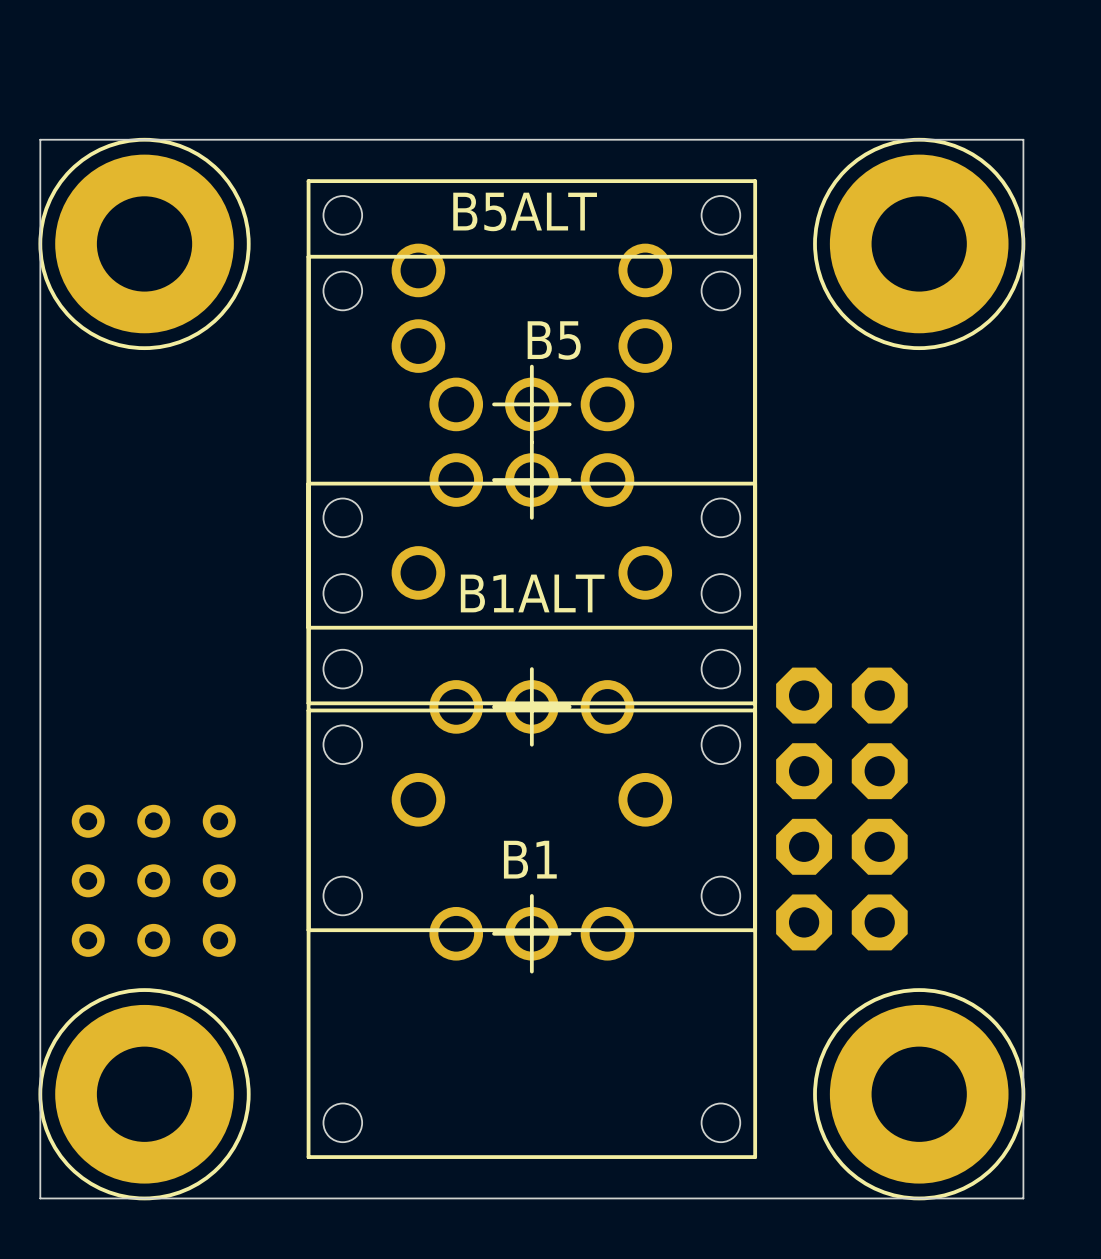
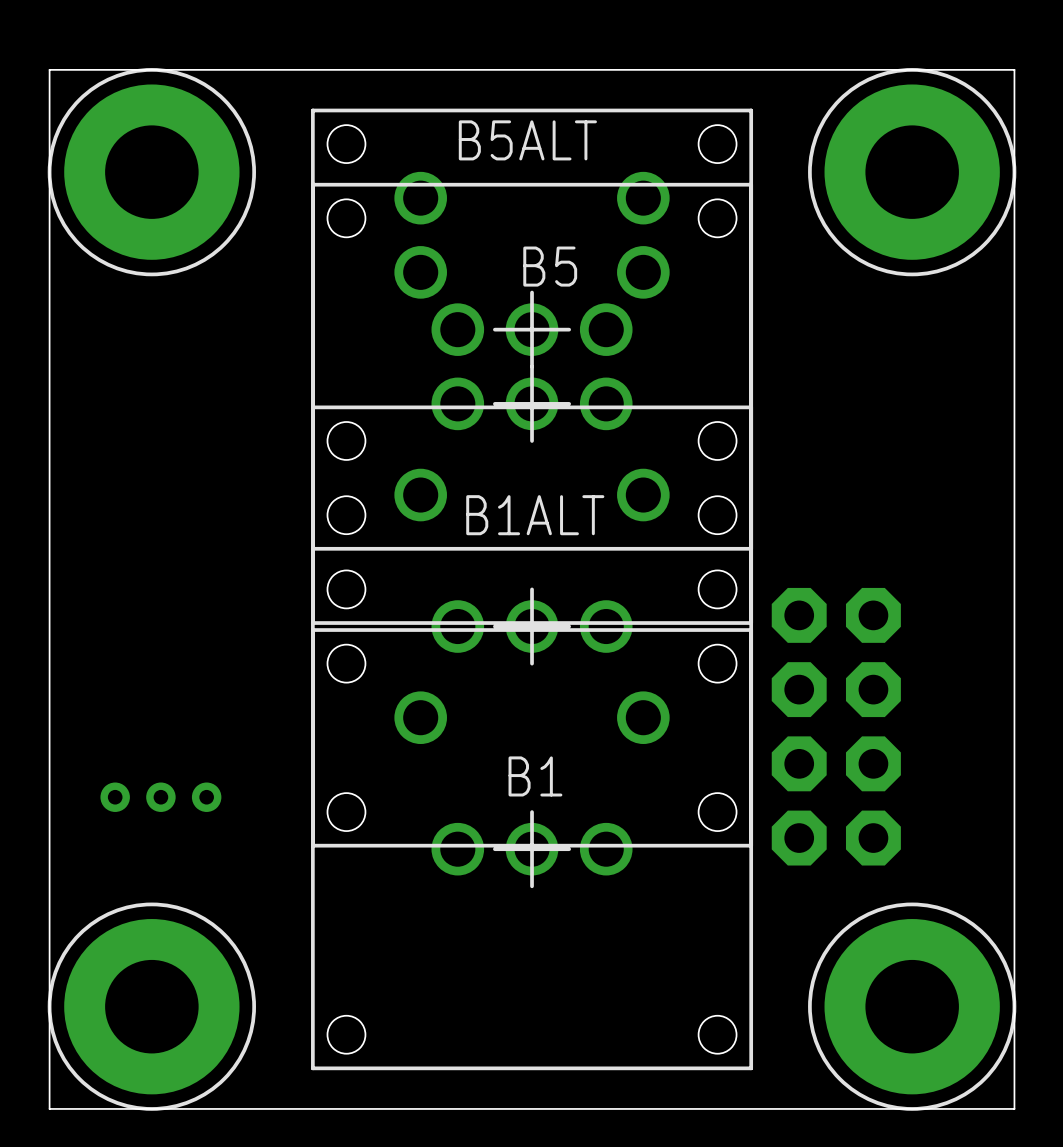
part footprint: [71, 804, 236, 957] -> [100, 782, 222, 812]

